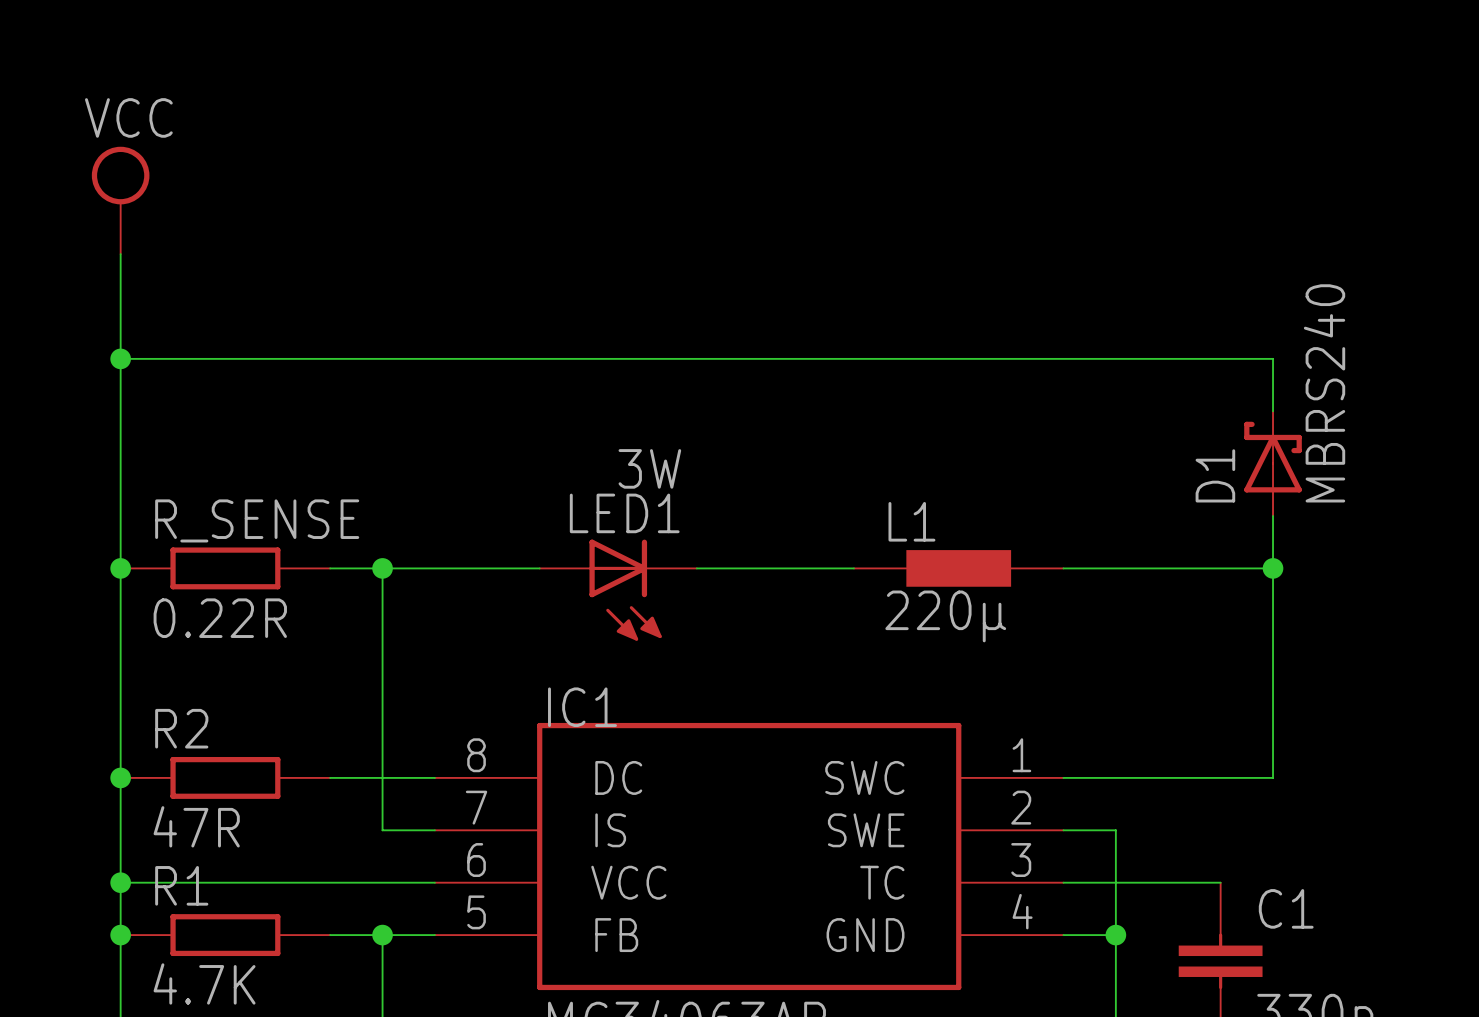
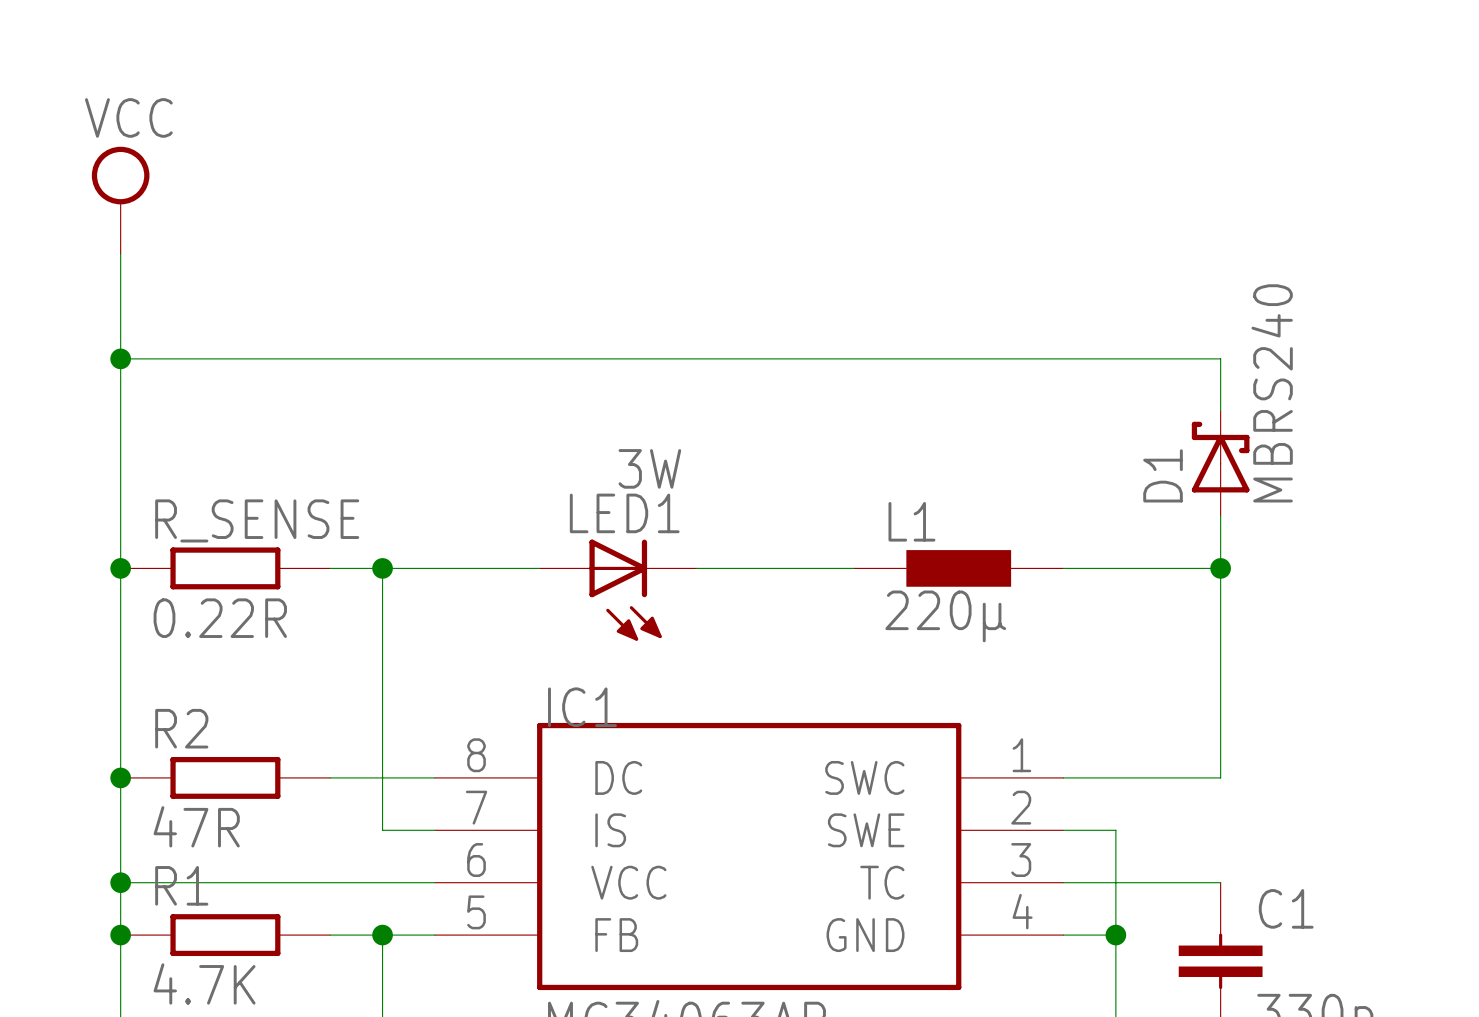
wire: (1220, 358) (1273, 358) (1273, 411) -> (1220, 358) (1220, 411)
D1 position: (1273, 463) -> (1220, 463)
wire: (1273, 516) (1273, 777) (1220, 777) -> (1220, 516) (1220, 777)
wire: (1220, 568) (1273, 568) -> none
junction position: (1273, 568) -> (1220, 568)

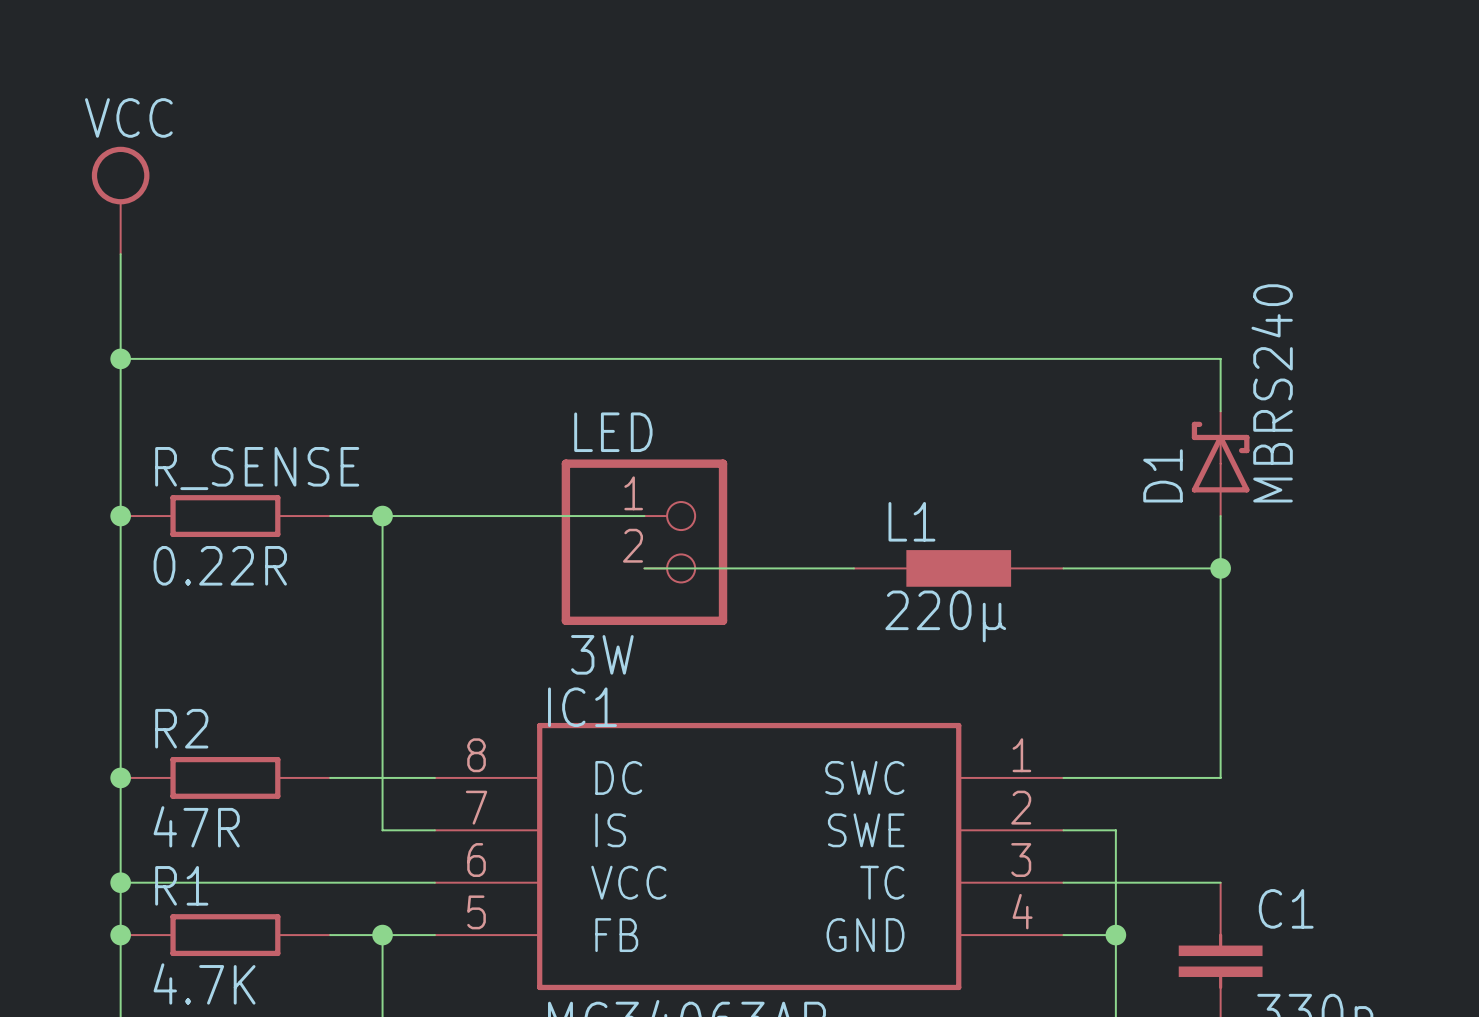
wire: none -> (330, 516) (644, 516)
wire: none -> (382, 516) (382, 568)
LED: none -> 3W (644, 542)
junction position: (120, 568) -> (120, 516)
R_SENSE position: (225, 568) -> (225, 516)
wire: (330, 568) (539, 568) -> none
junction position: (382, 568) -> (382, 516)
LED1: 3W (618, 590) -> none

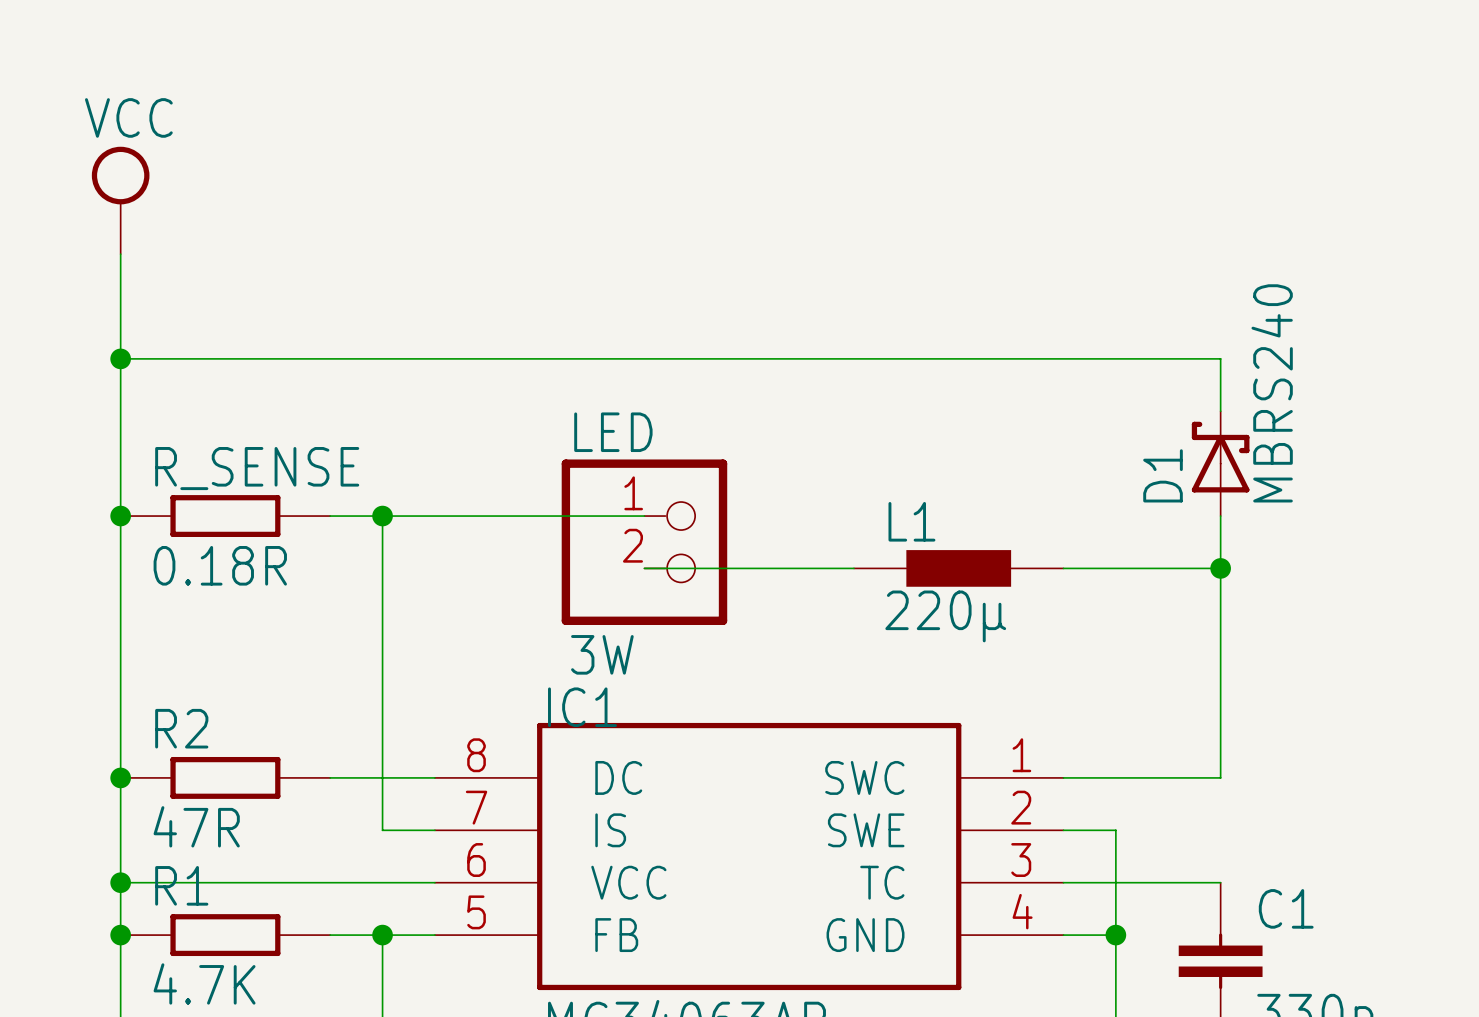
R_SENSE value: 0.22R (220, 565) -> 0.18R (220, 565)

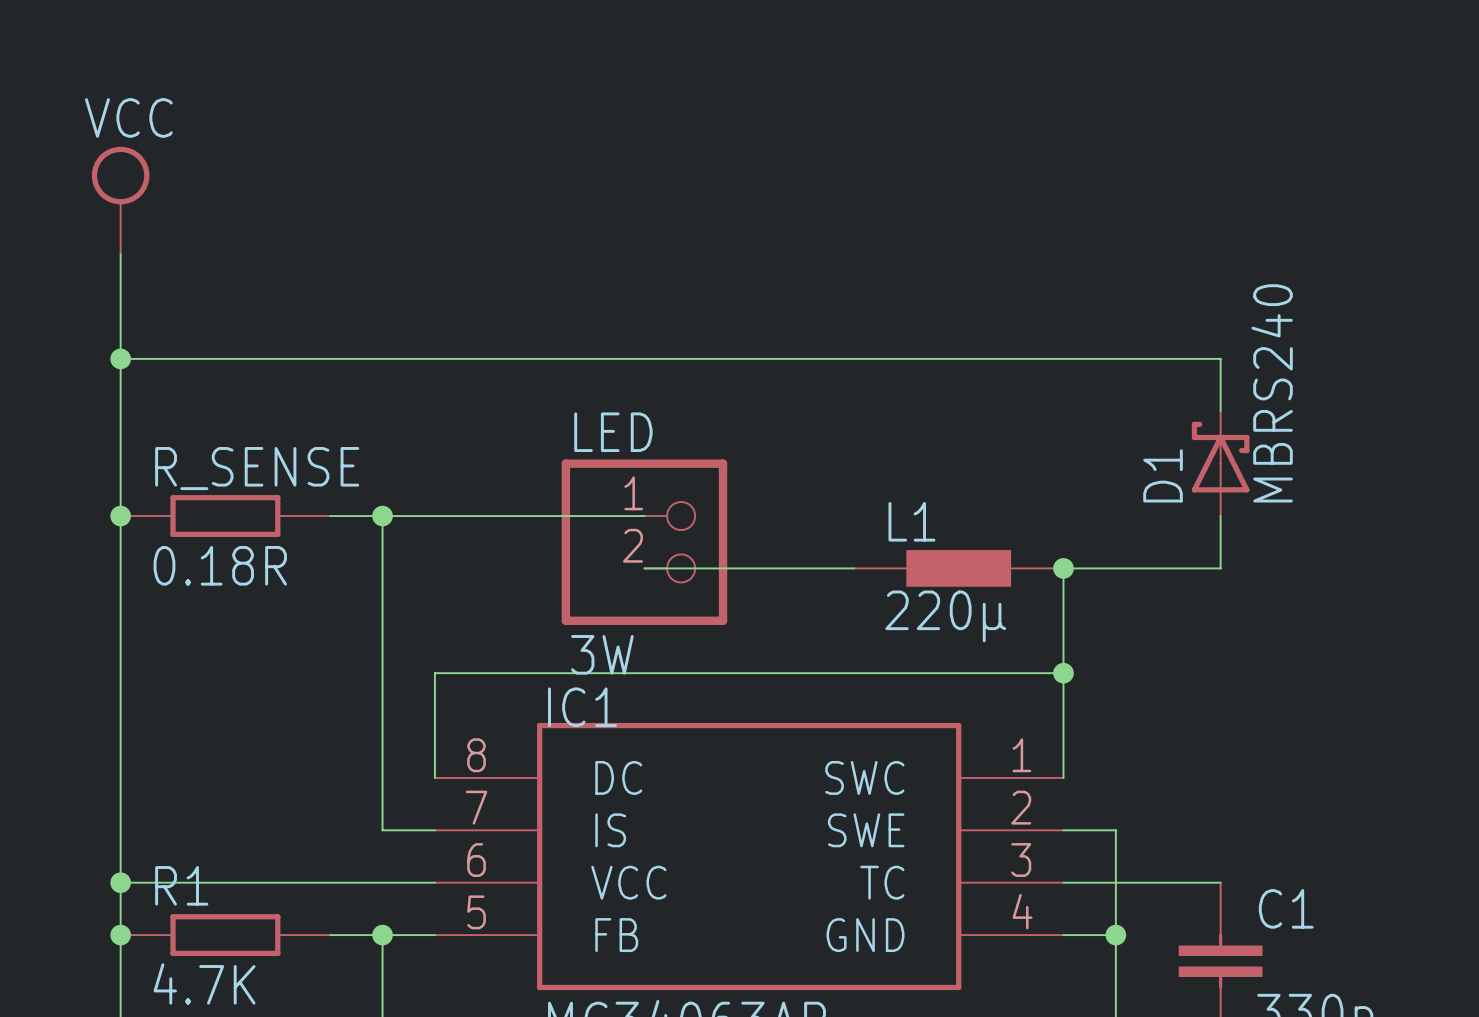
junction: none -> (1063, 568)
wire: (1220, 568) (1220, 777) (1063, 777) -> (1063, 568) (1063, 777)
junction: (1220, 568) -> none
junction: none -> (1063, 673)
junction: (120, 777) -> none
R2: 47R (225, 777) -> none
wire: (330, 777) (434, 777) -> (1063, 673) (434, 673) (434, 777)

